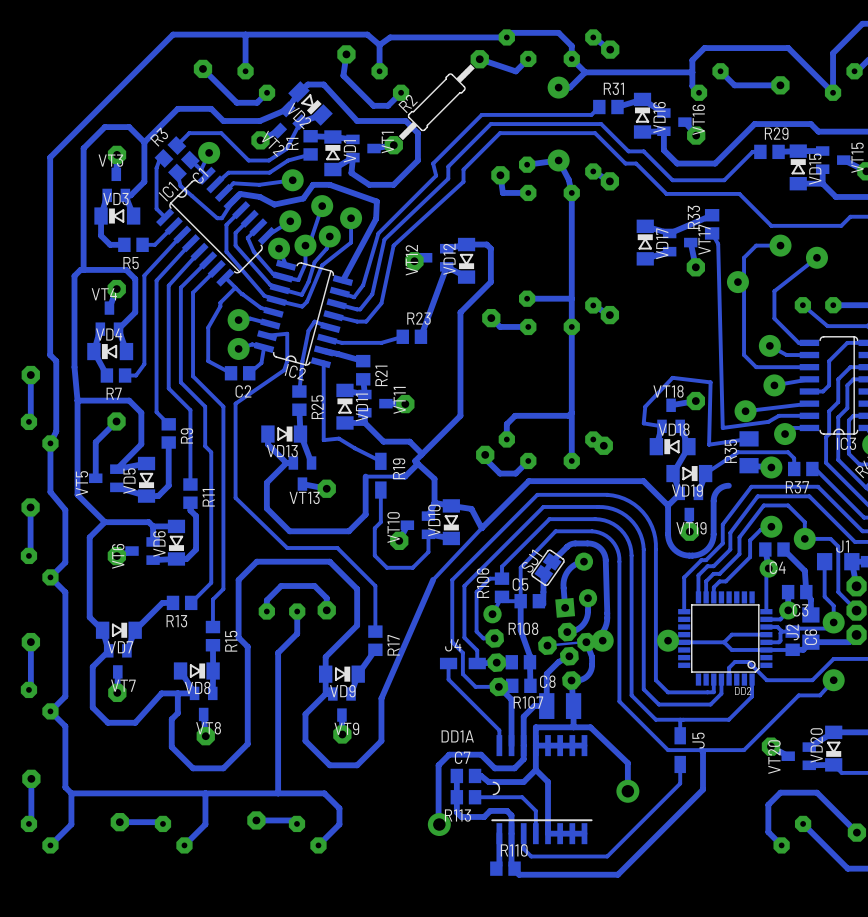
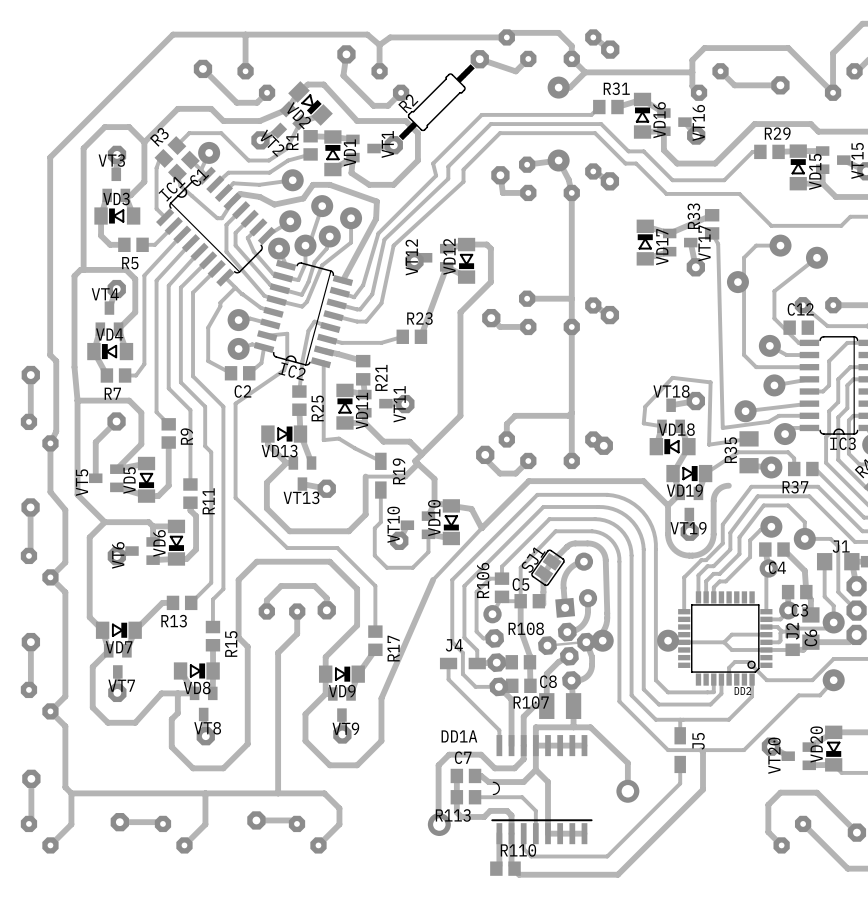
C12: none -> (798, 327)

